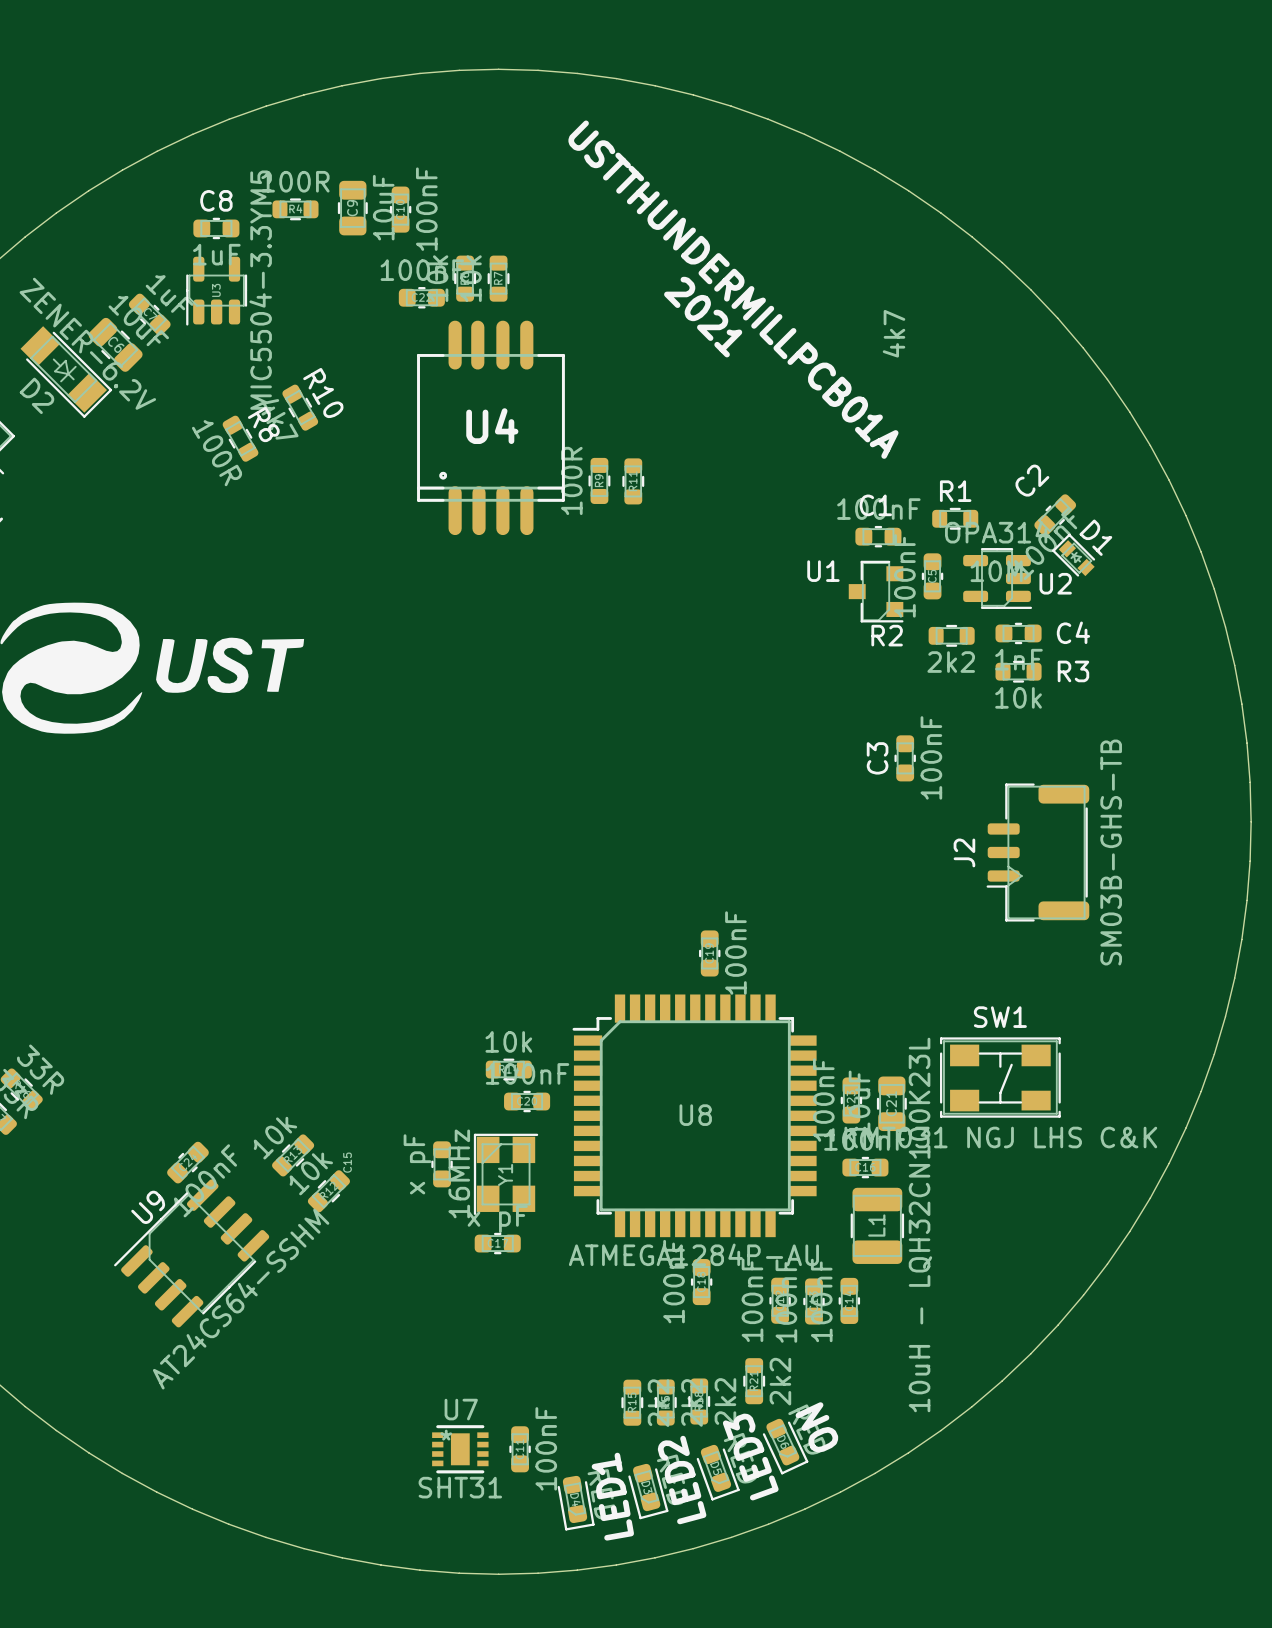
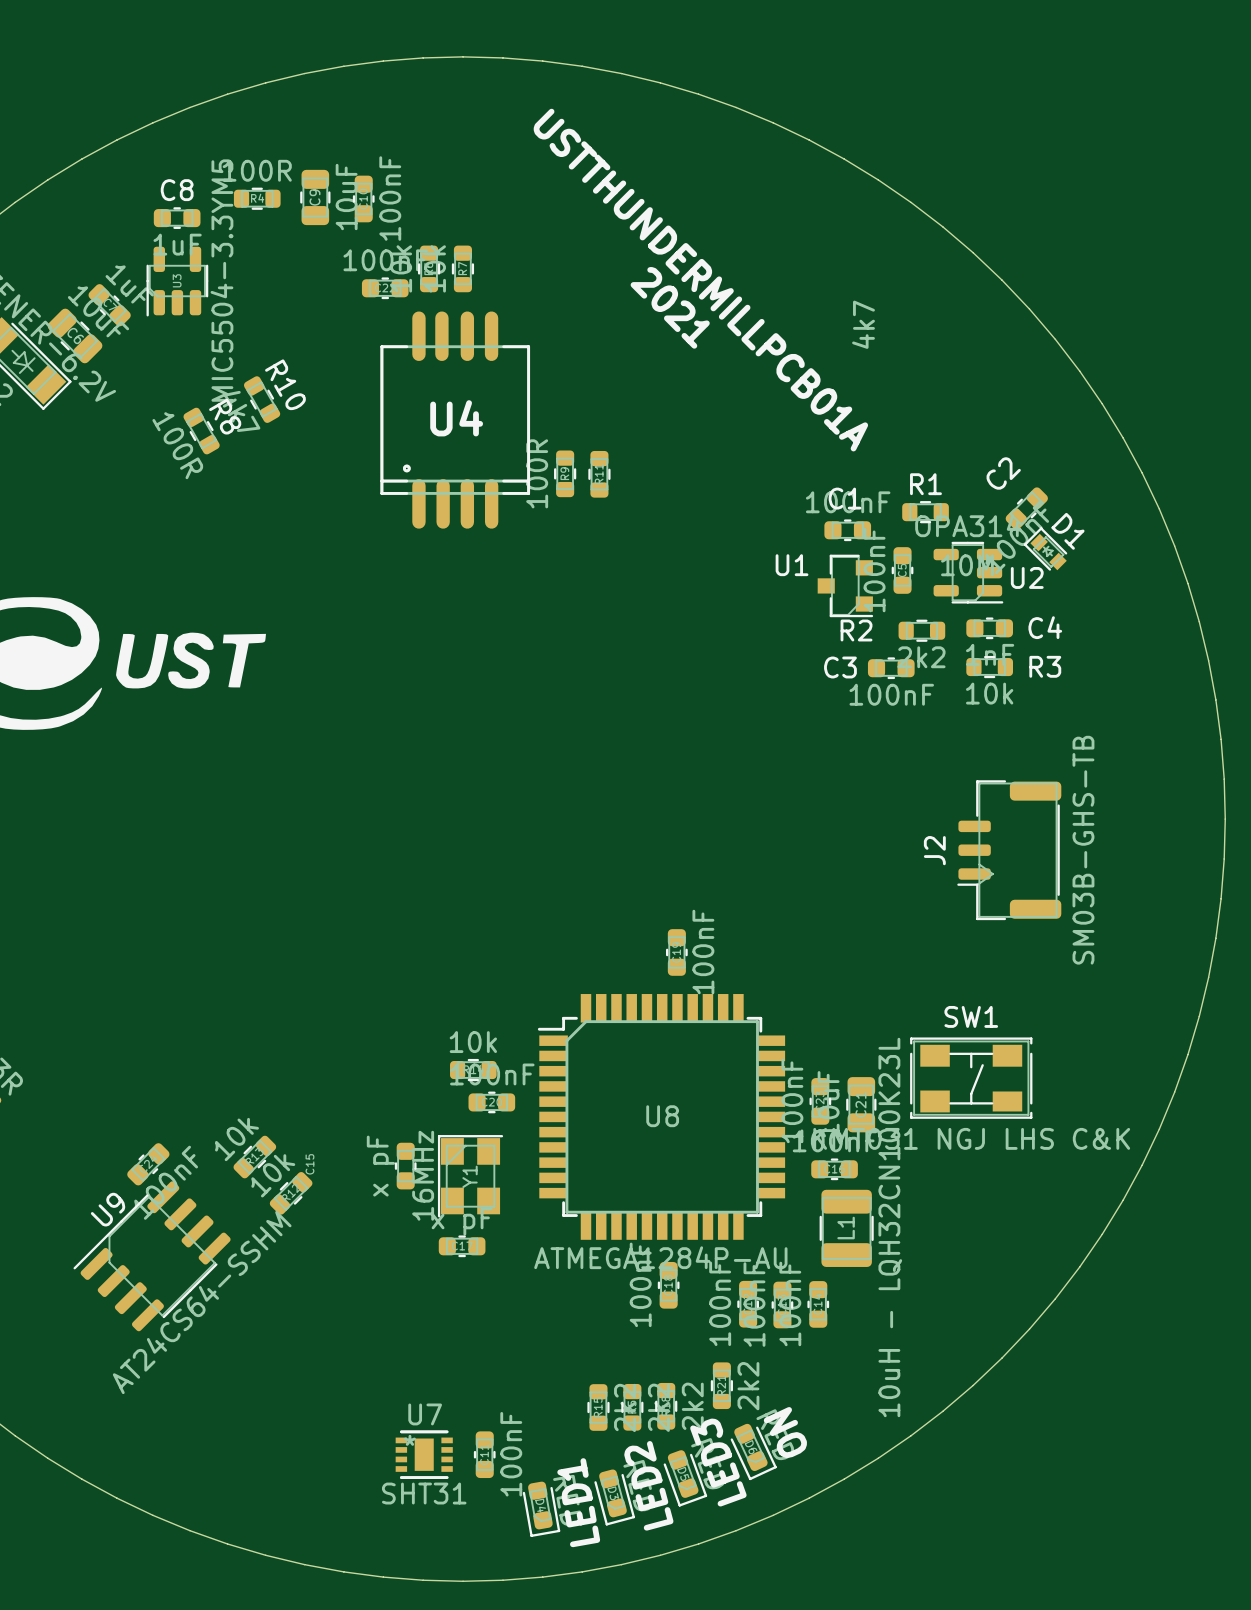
C3 rotation: 0° (905, 758) -> 90° clockwise (891, 668)
C3 position: (905, 758) -> (891, 668)

